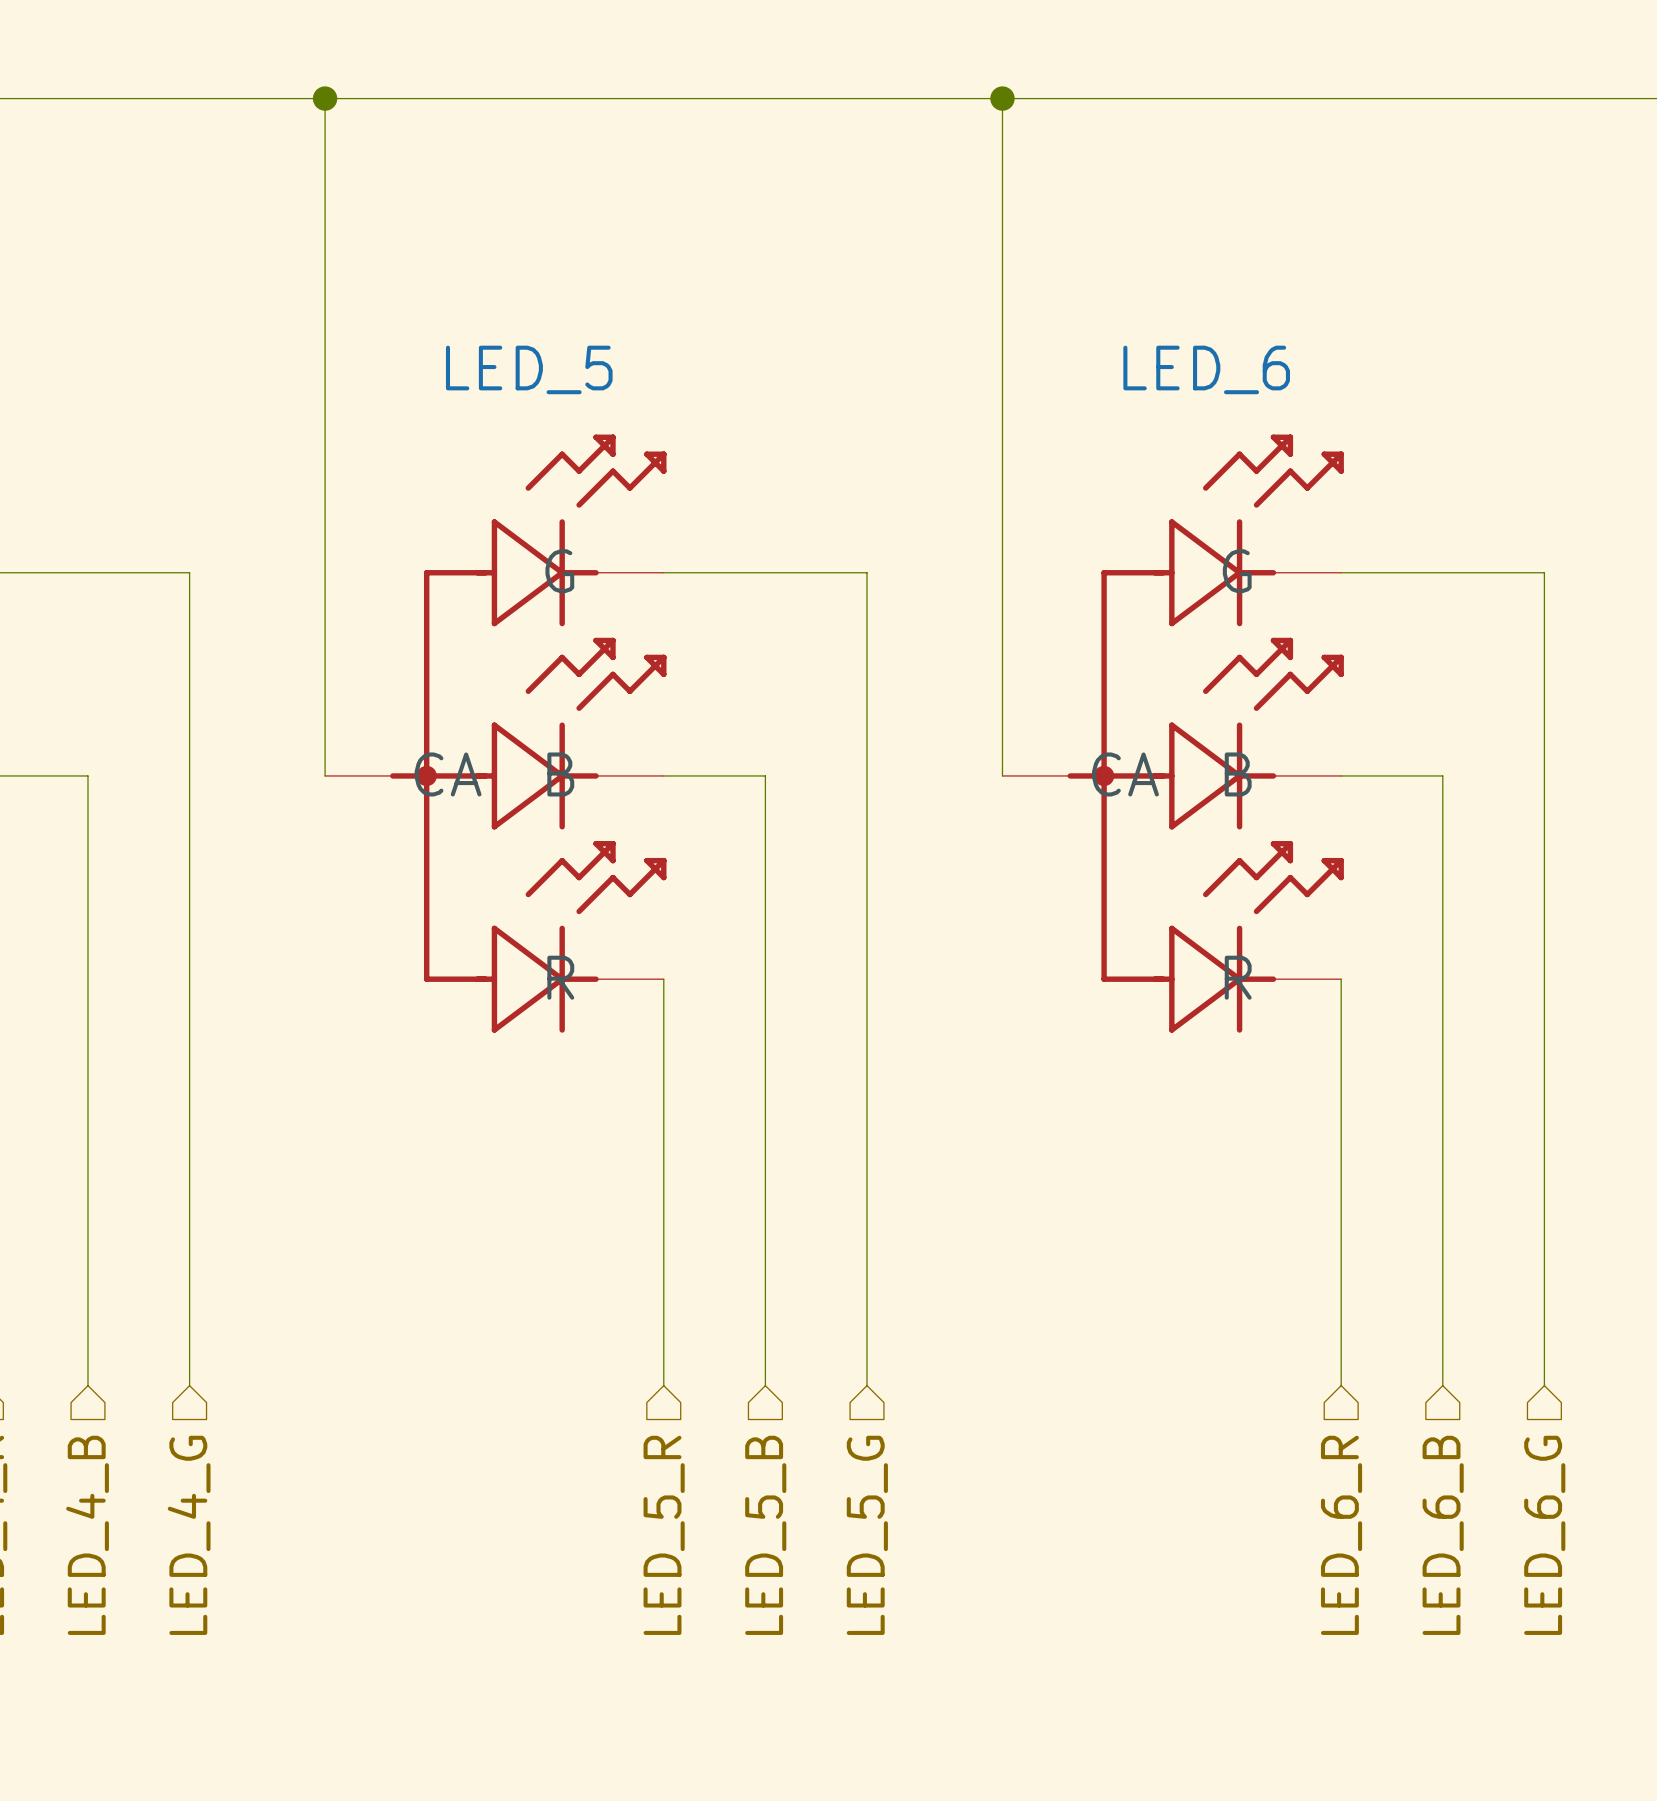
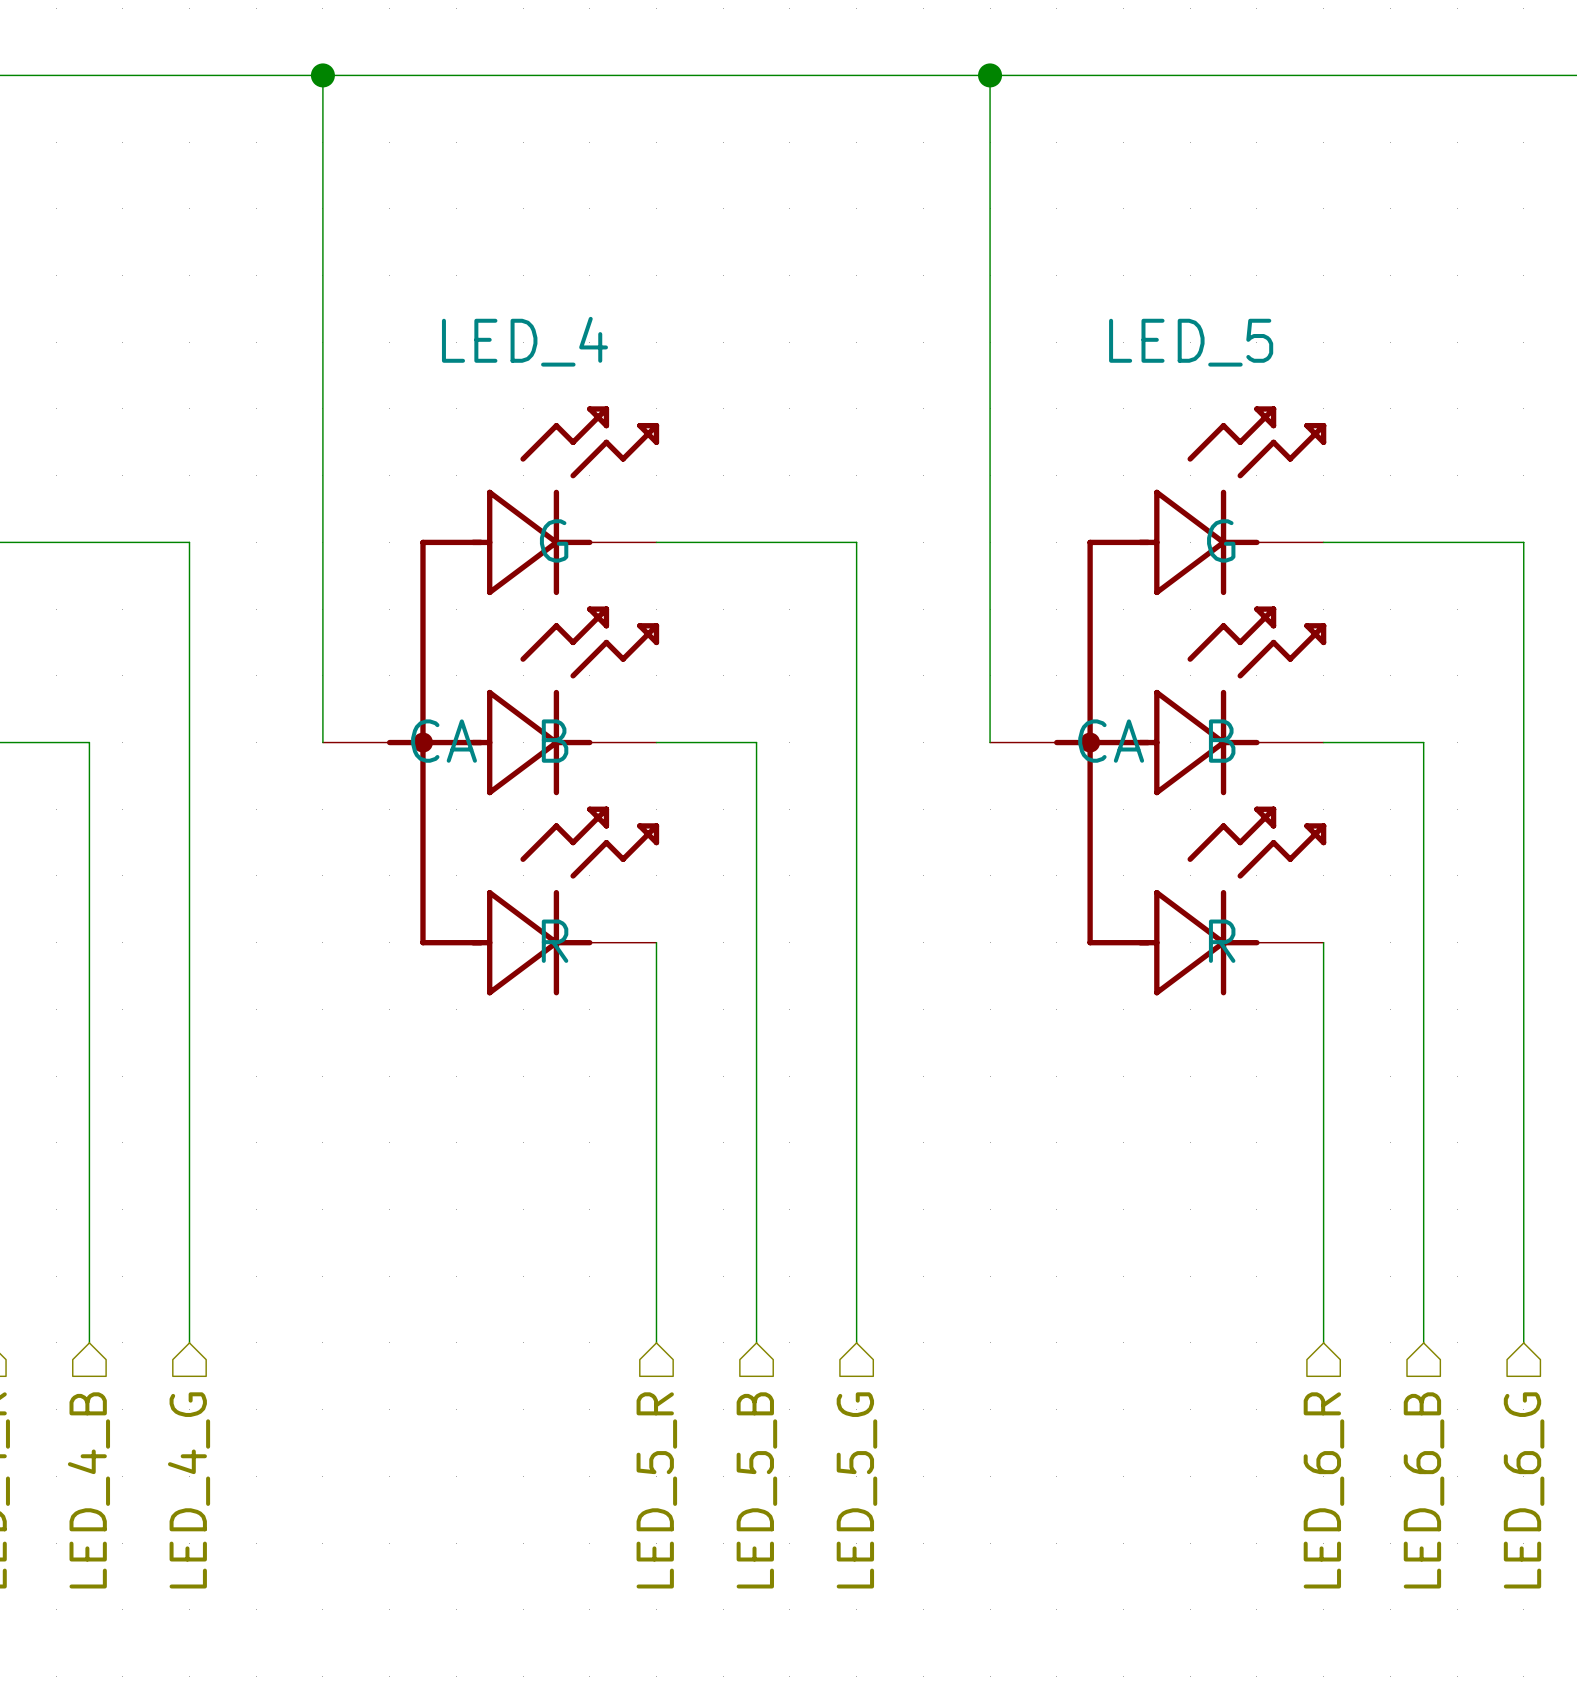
LED_5 name: LED_5 (529, 369) -> LED_4 (524, 341)
LED_6 name: LED_6 (1206, 369) -> LED_5 (1191, 342)

